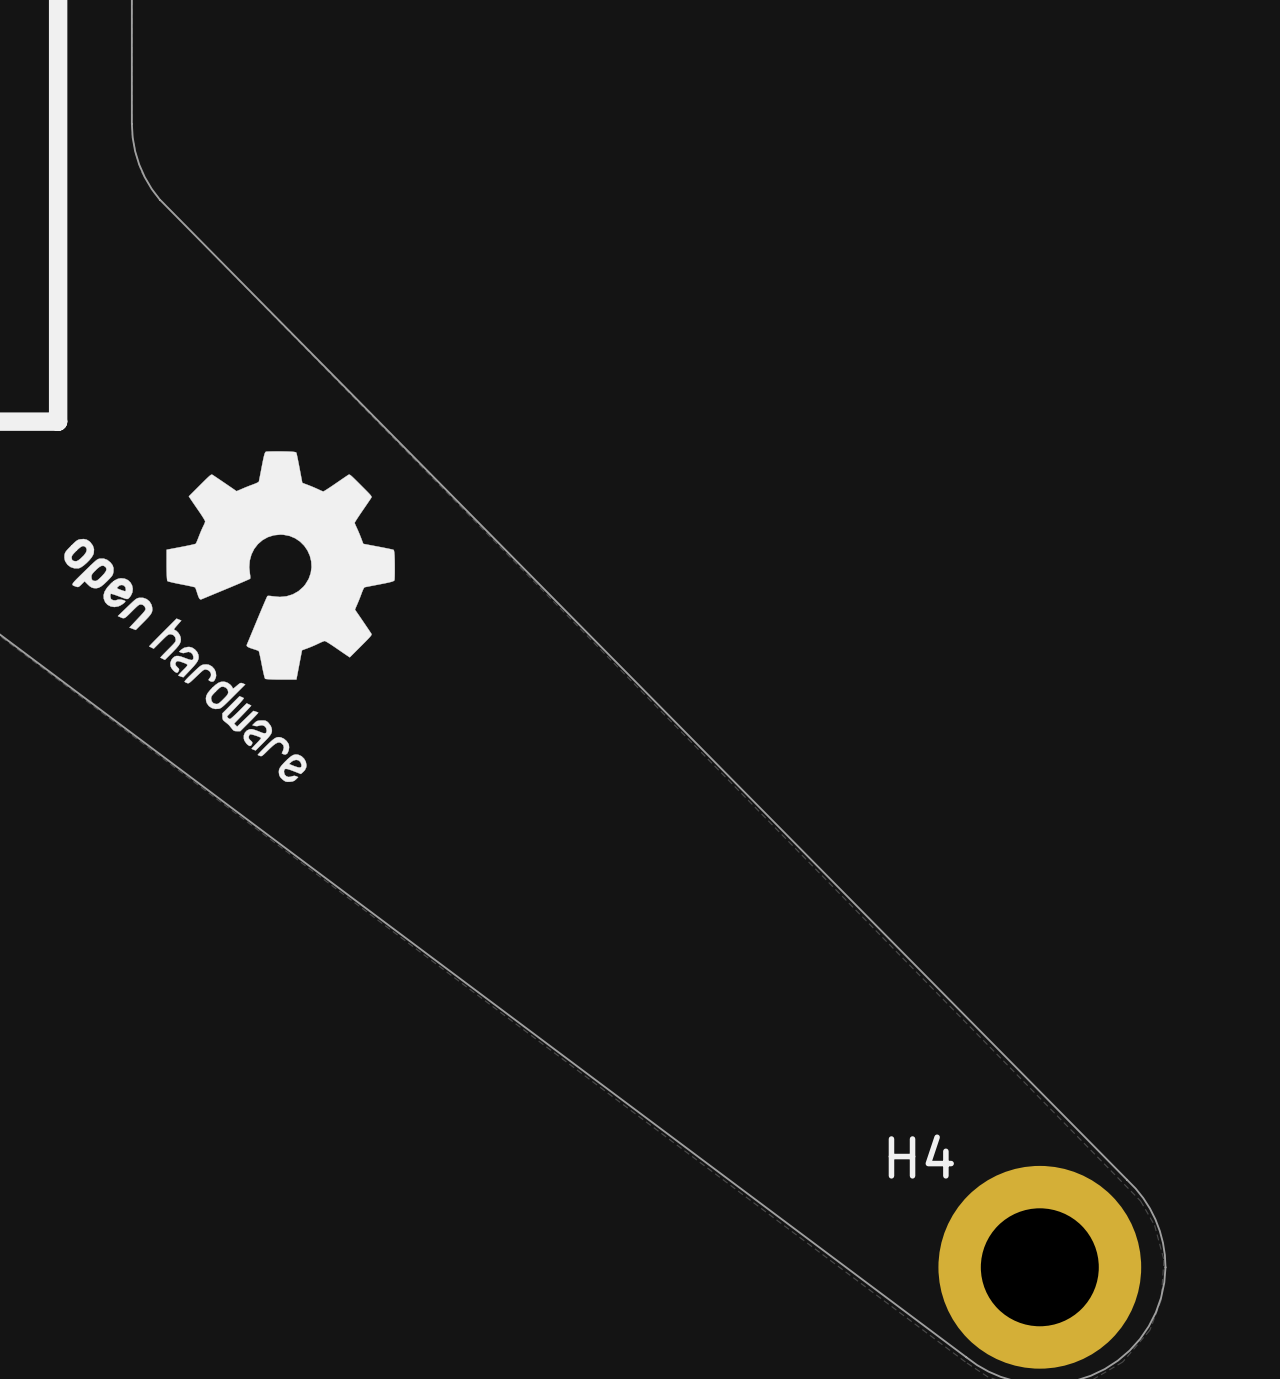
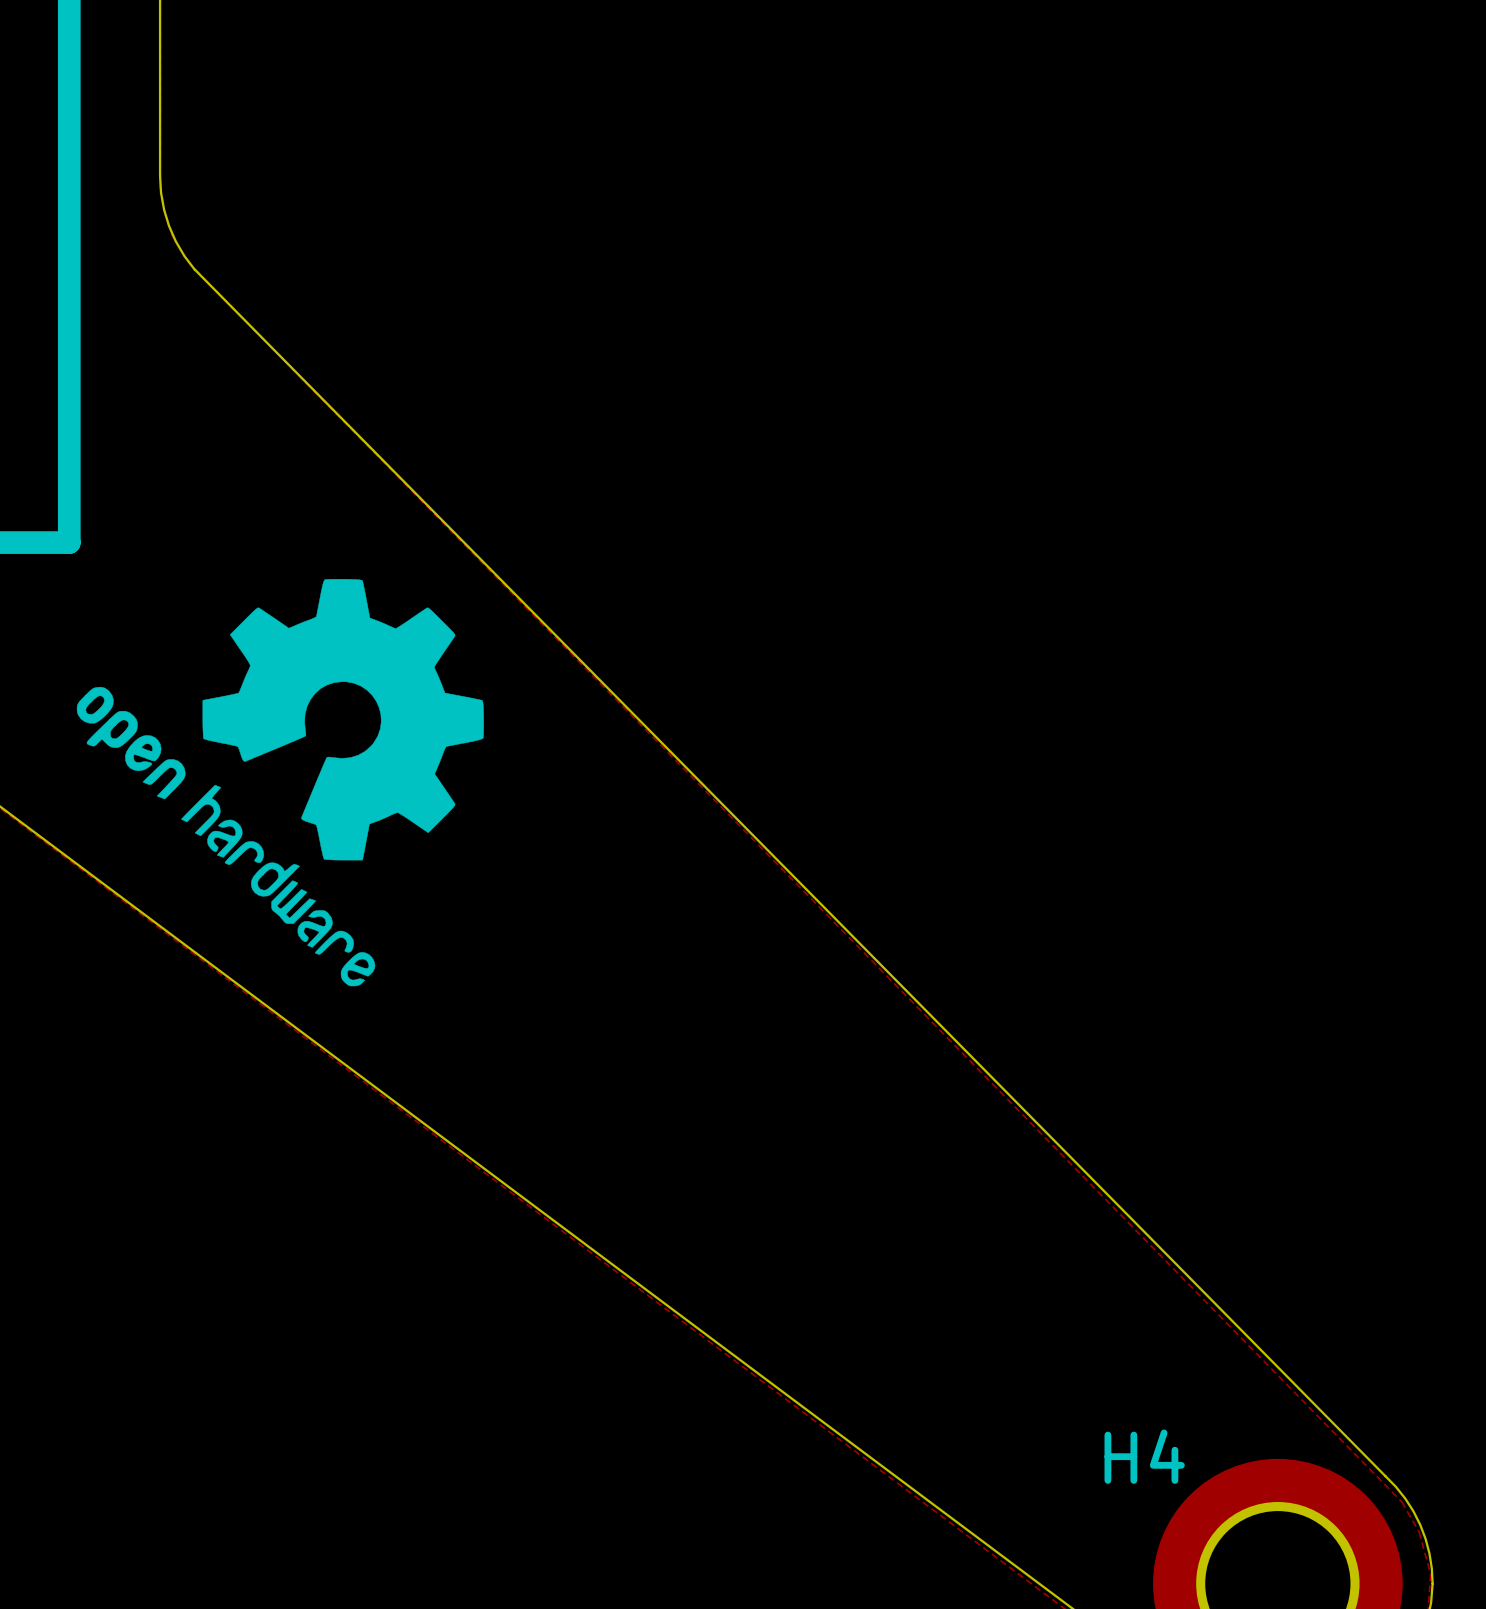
H4 name position: H4 (921, 1156) -> H4 (1144, 1456)

